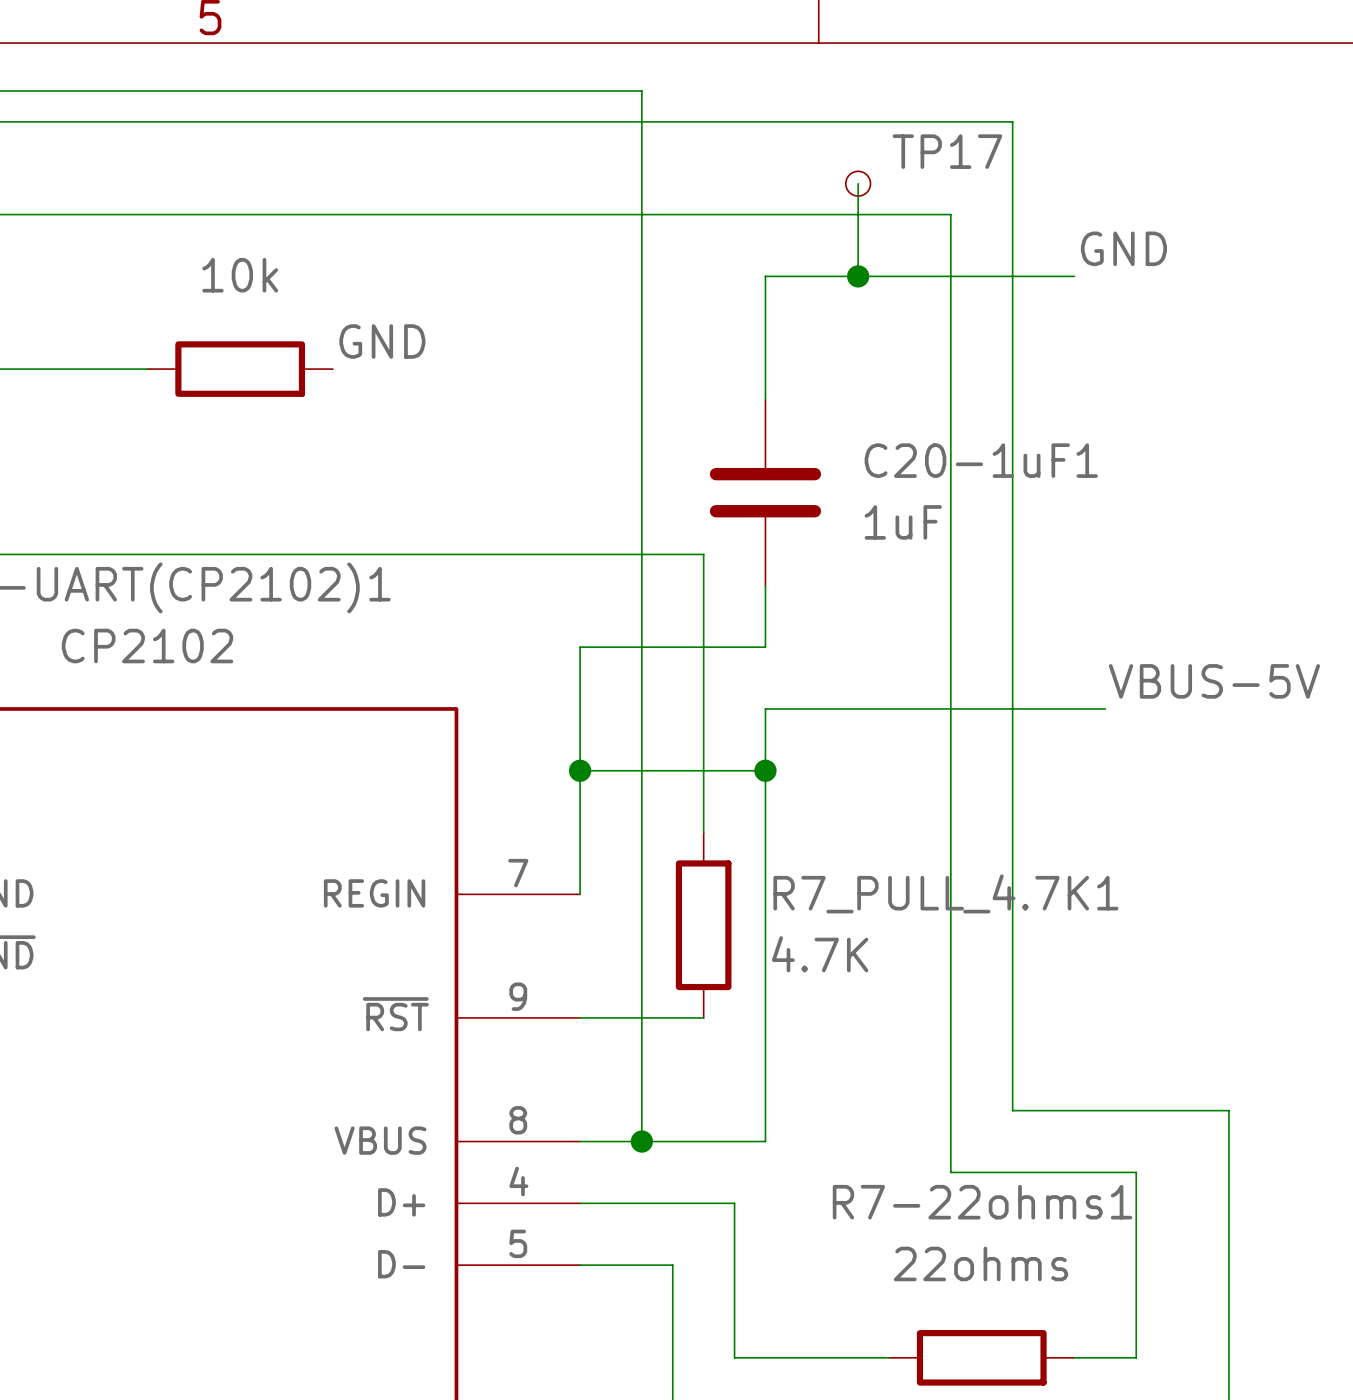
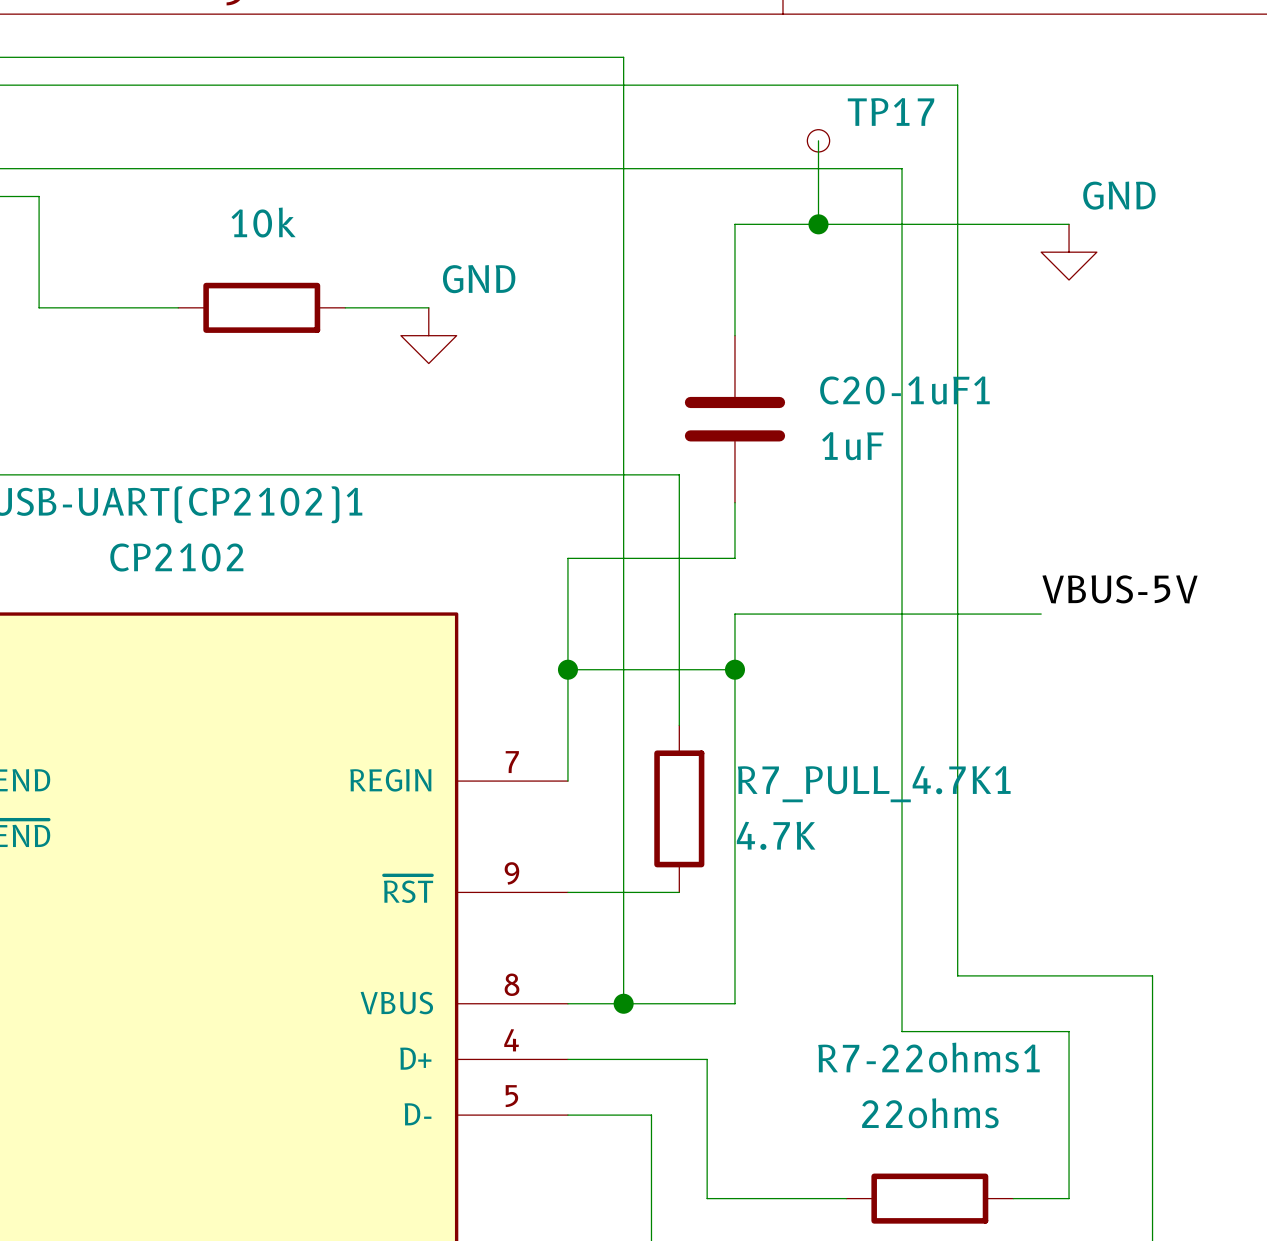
label: GND (1123, 248) -> none
wire: none -> (1013, 224) (1069, 224)
power symbol: none -> GND (1069, 252)
label: GND (382, 341) -> none
wire: none -> (345, 307) (428, 307)
power symbol: none -> GND (428, 335)

